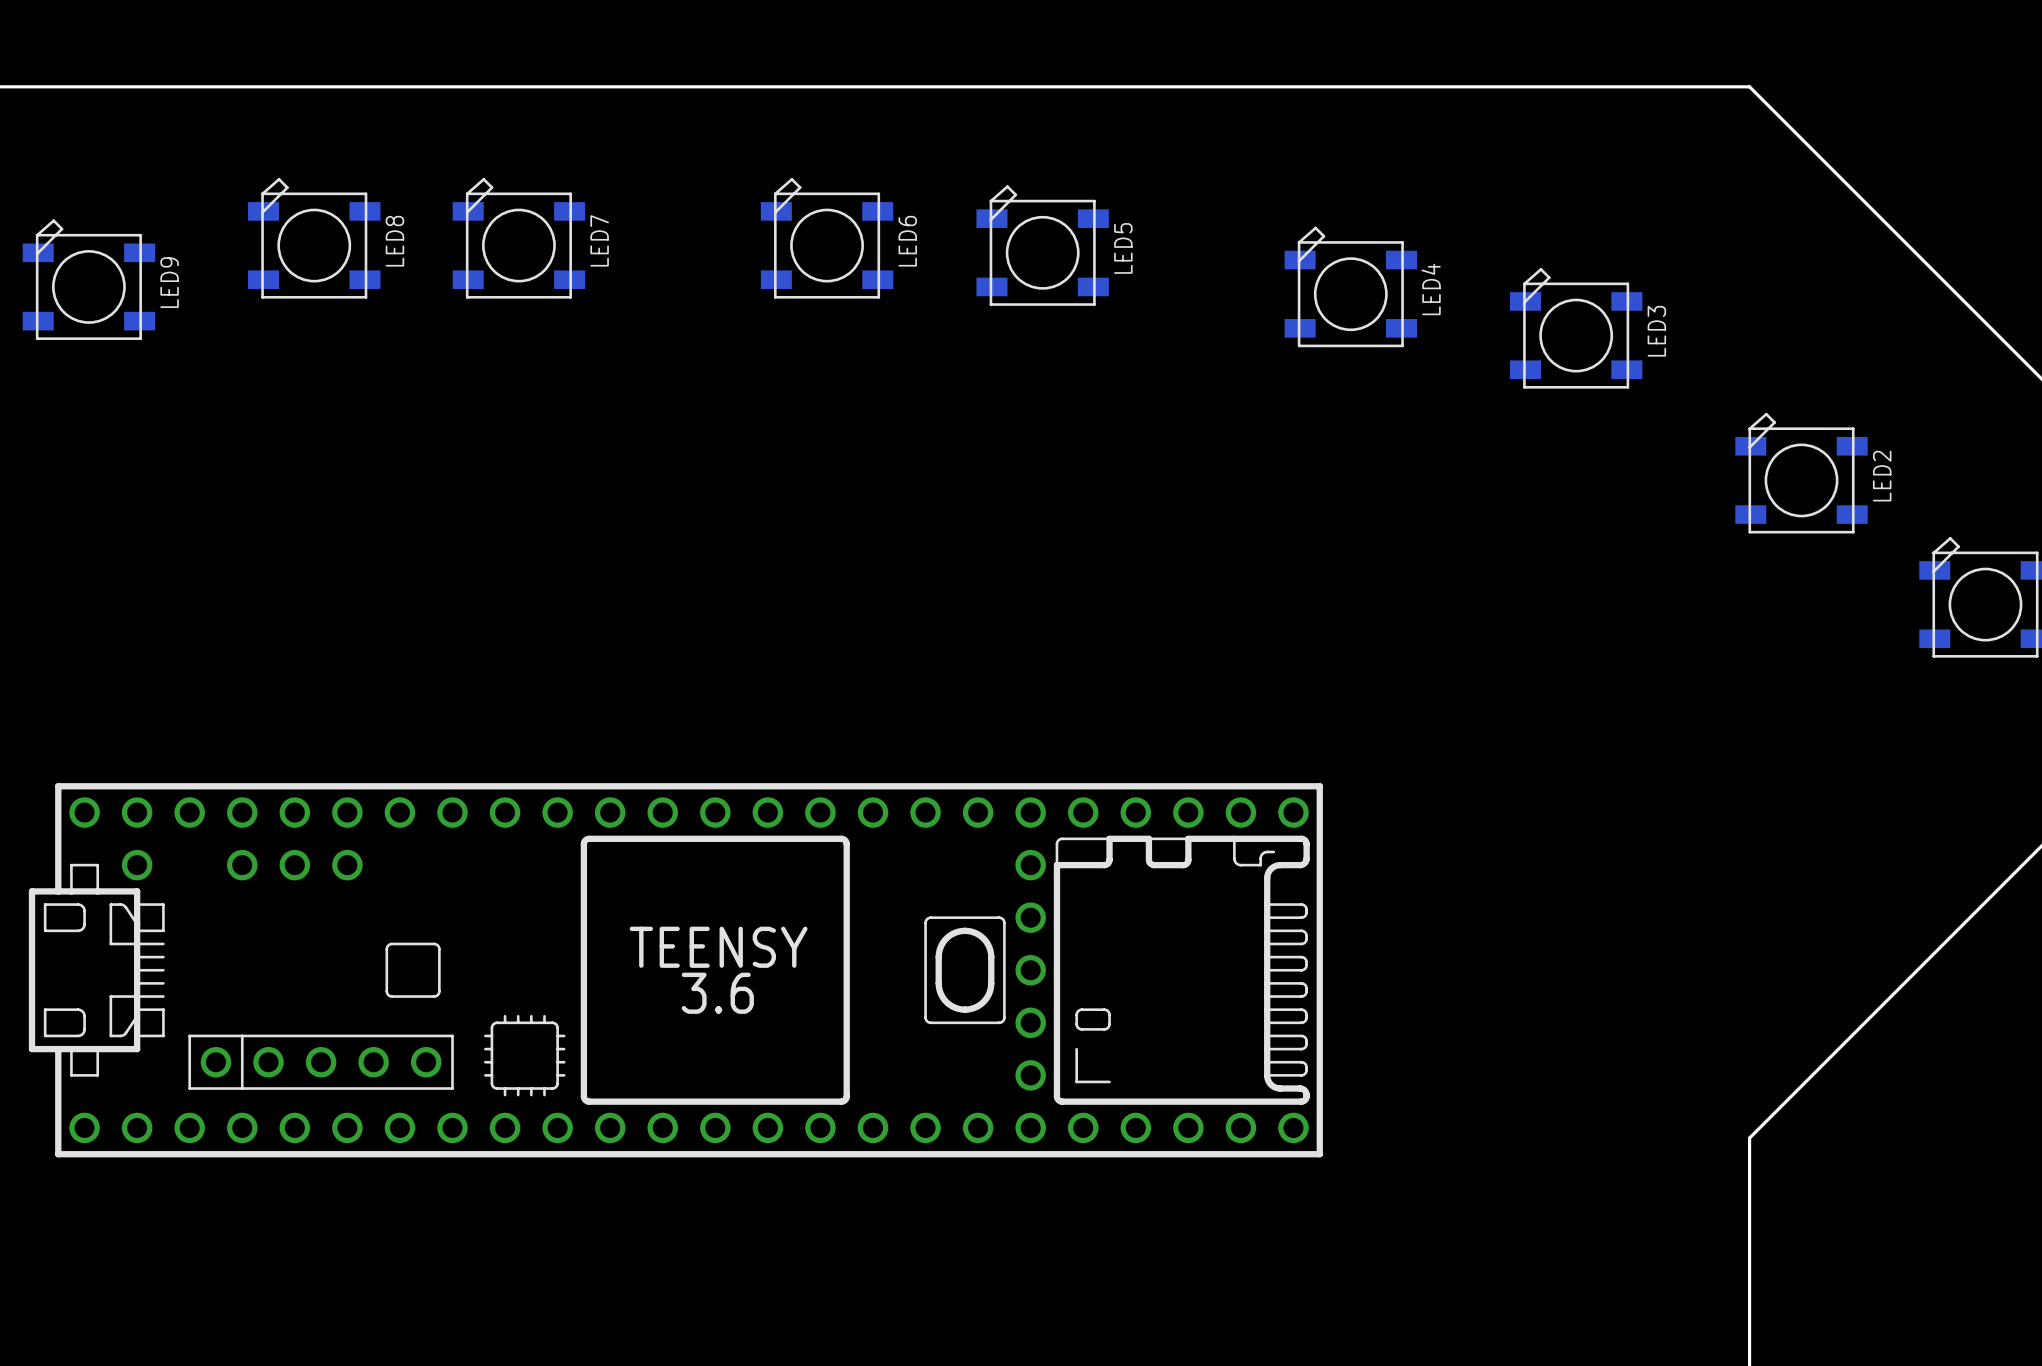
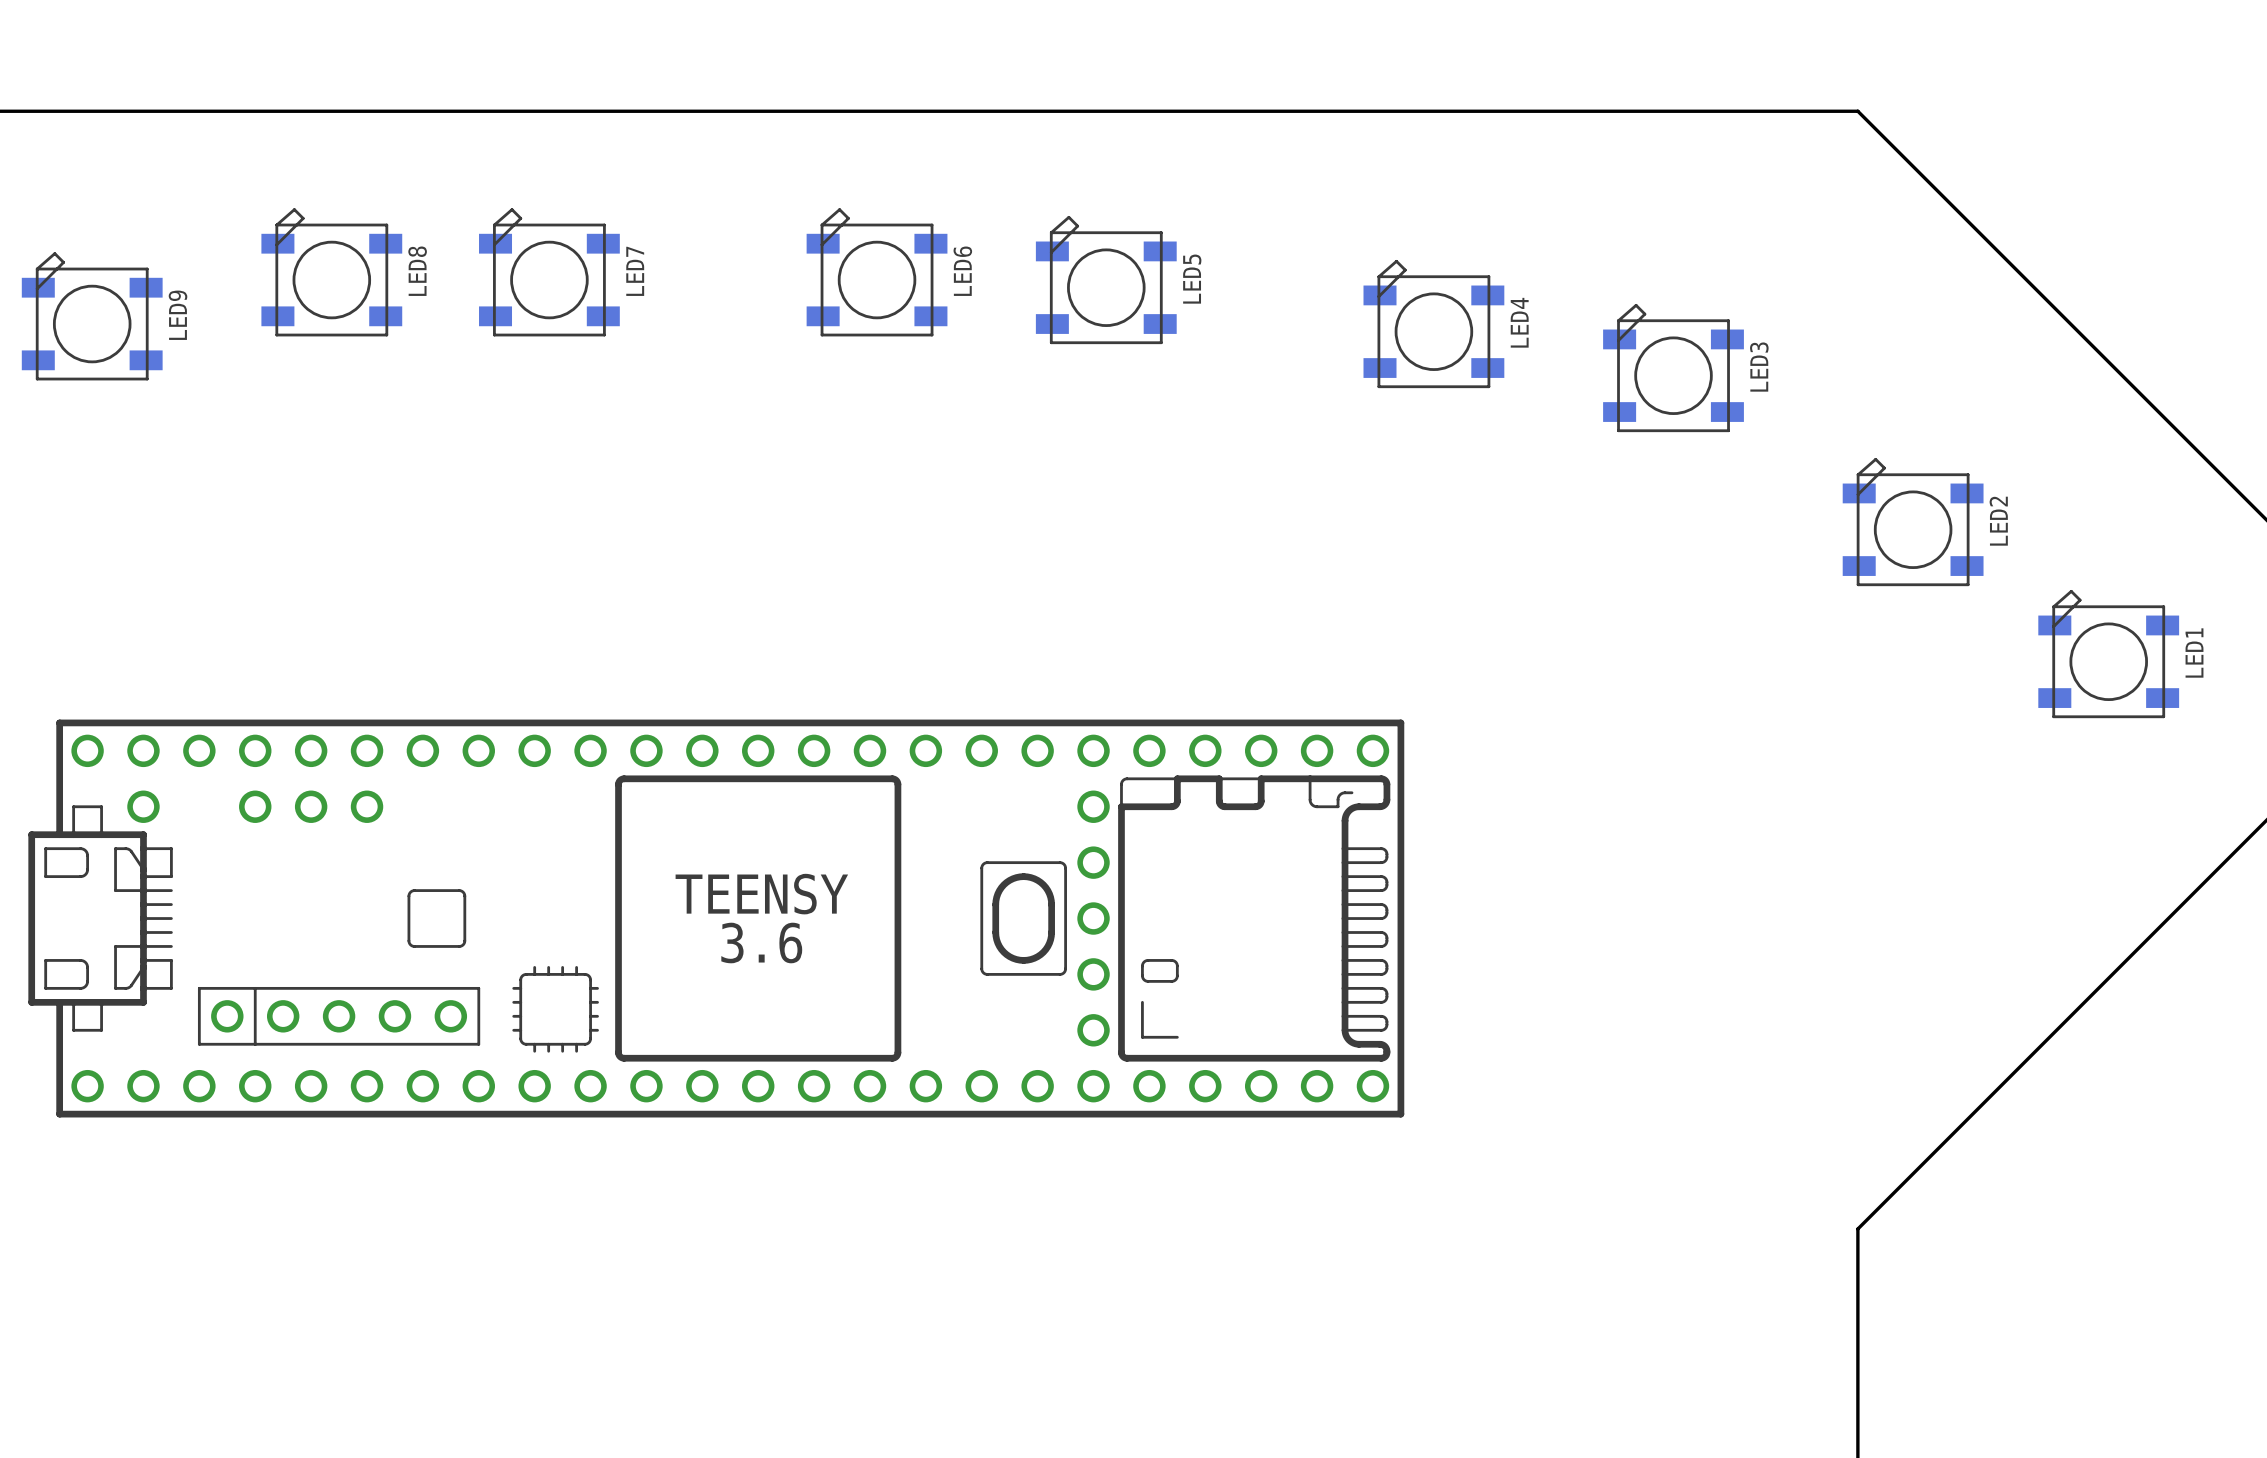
part position: (675, 970) -> (716, 918)

